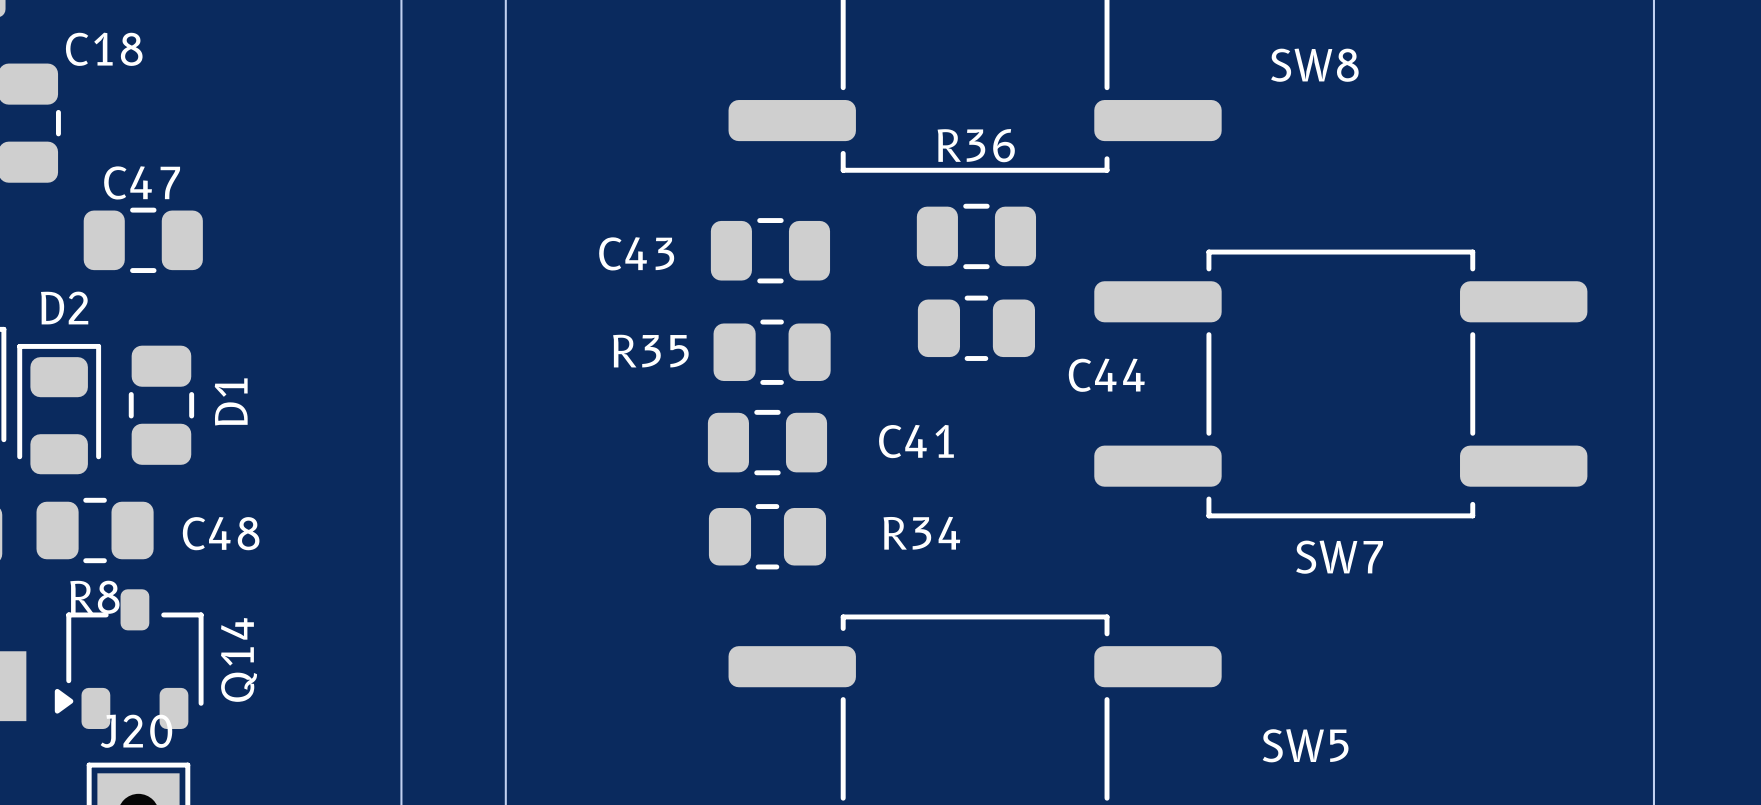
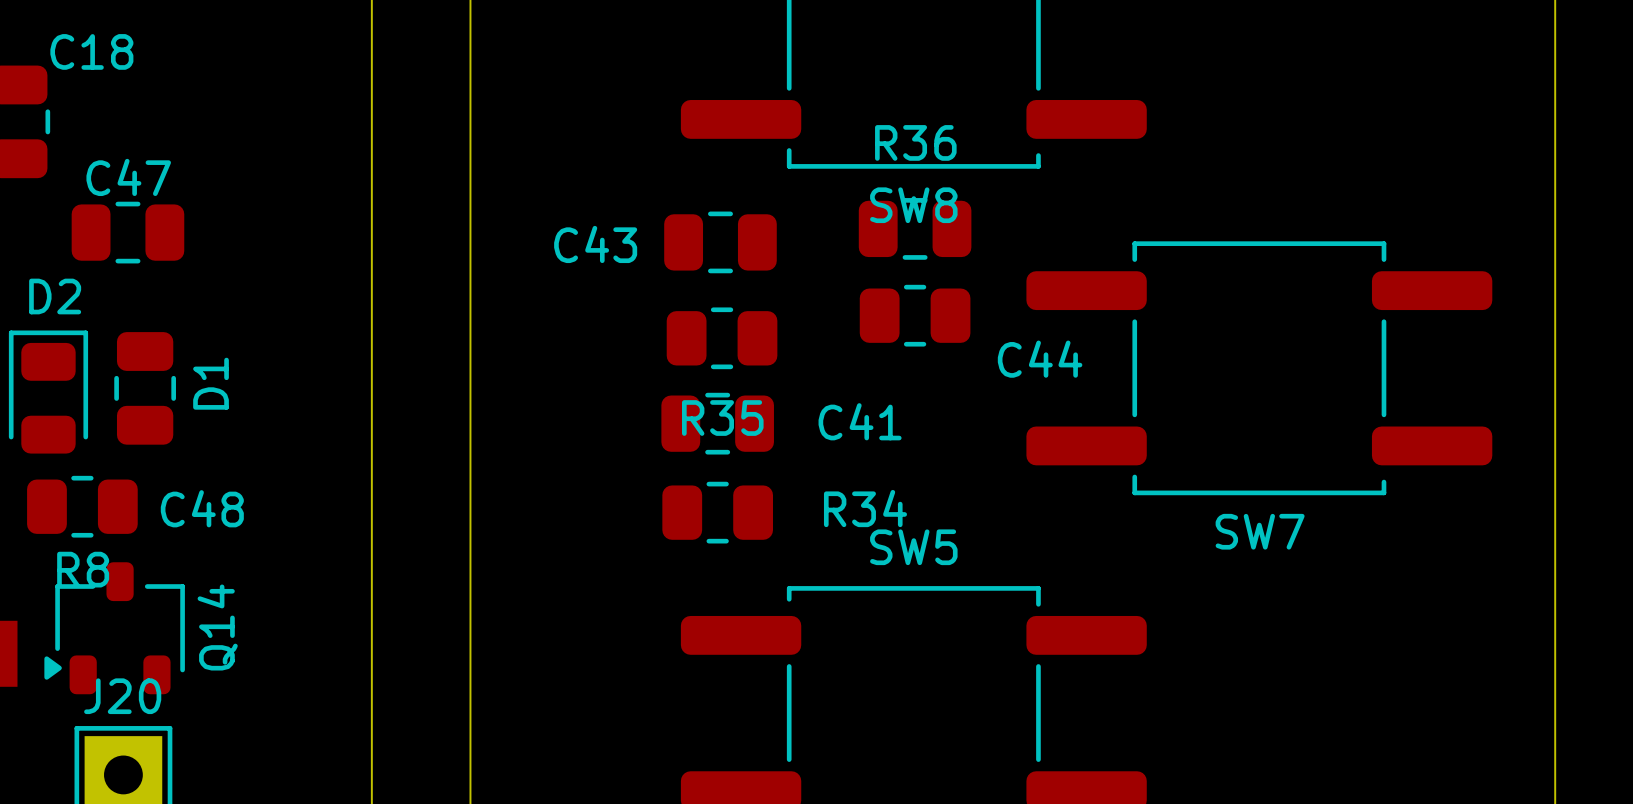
SW8 name position: SW8 (1314, 65) -> SW8 (913, 205)
R35 name position: R35 (650, 351) -> R35 (722, 418)
SW5 name position: SW5 (1305, 745) -> SW5 (913, 547)

